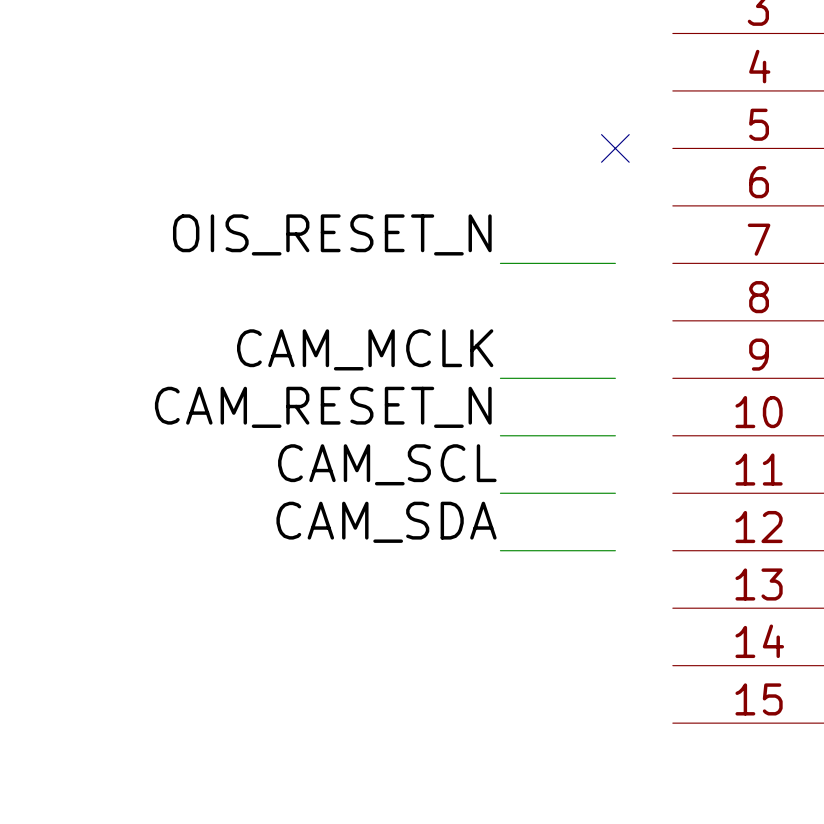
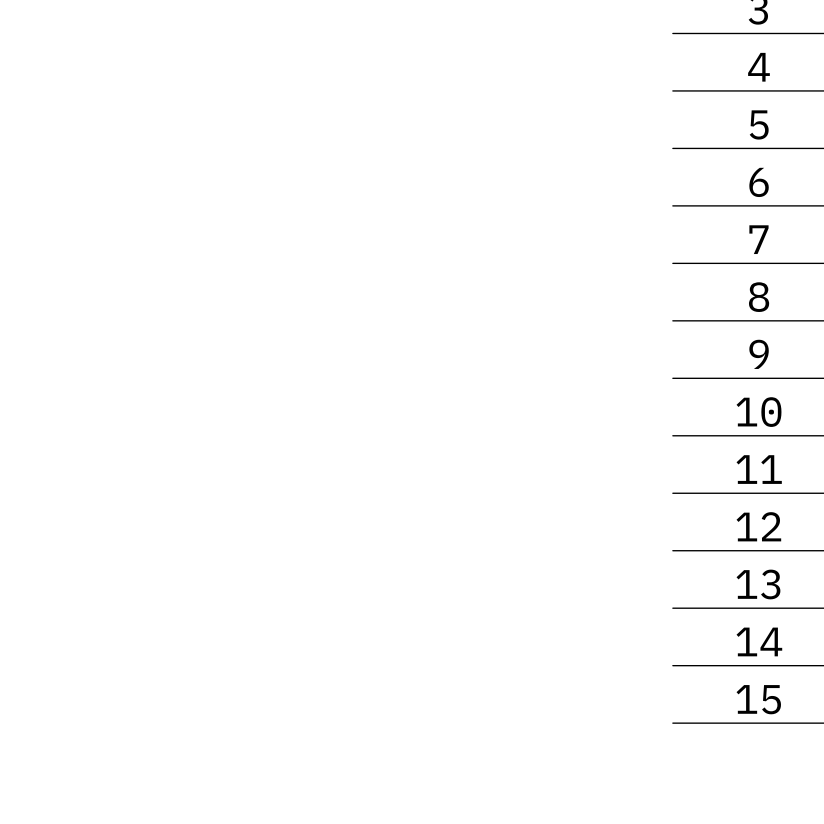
no-connect mark: (615, 148) -> none
label: OIS_RESET_N (332, 234) -> none
wire: (500, 263) (615, 263) -> none
label: CAM_MCLK (365, 349) -> none
wire: (500, 378) (615, 378) -> none
label: CAM_RESET_N (323, 407) -> none
wire: (500, 435) (615, 435) -> none
label: CAM_SCL (387, 464) -> none
wire: (500, 493) (615, 493) -> none
label: CAM_SDA (386, 522) -> none
wire: (500, 550) (615, 550) -> none

